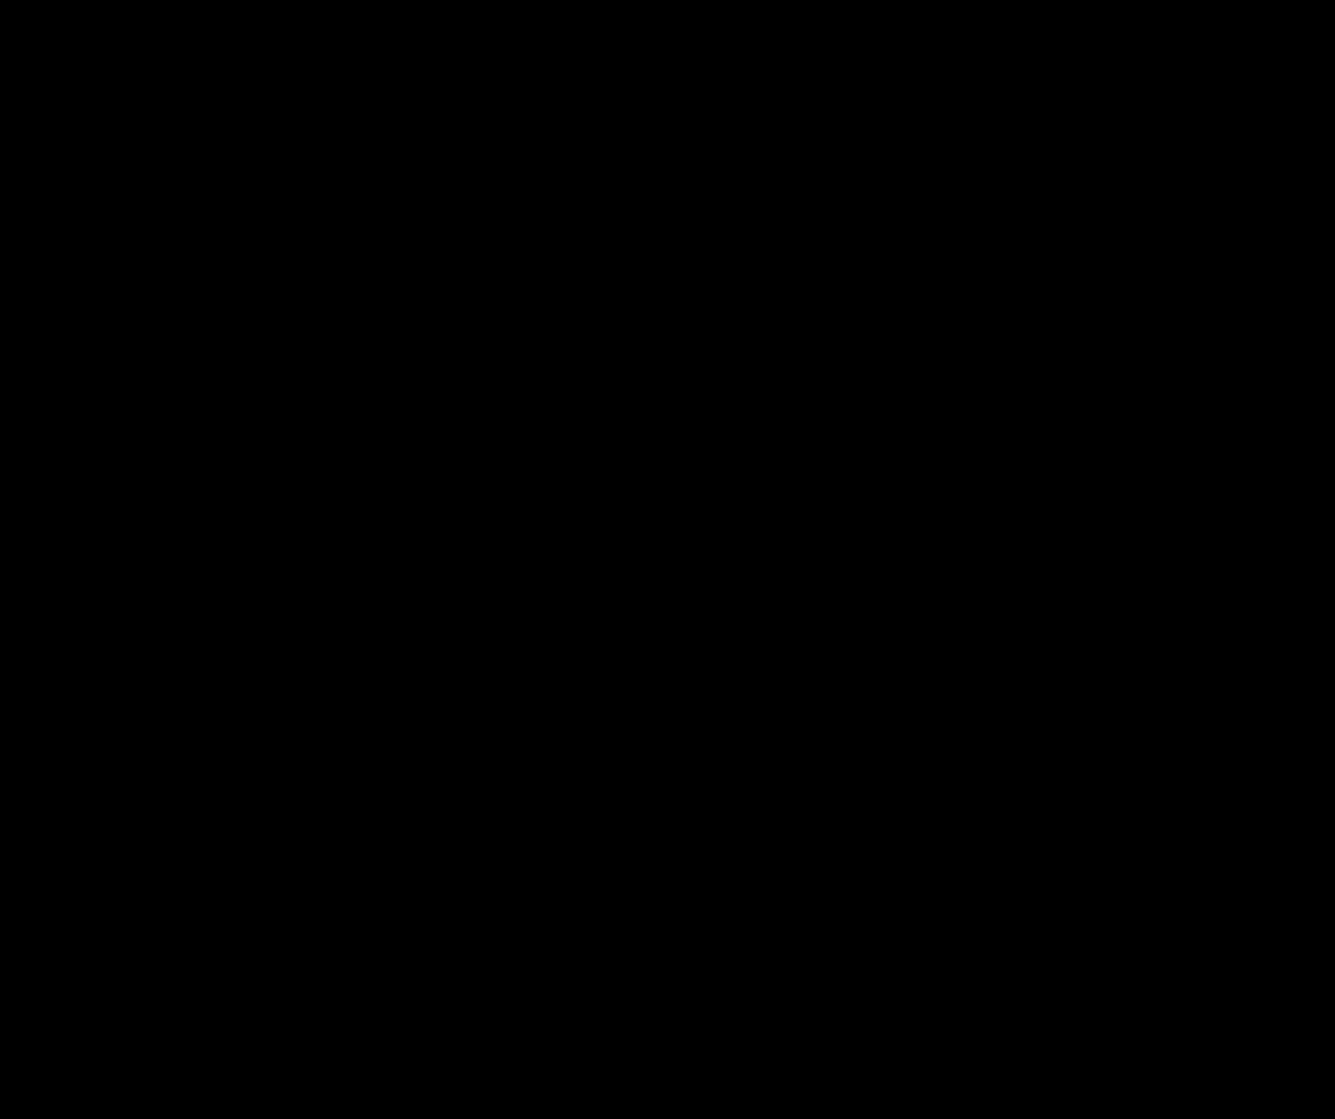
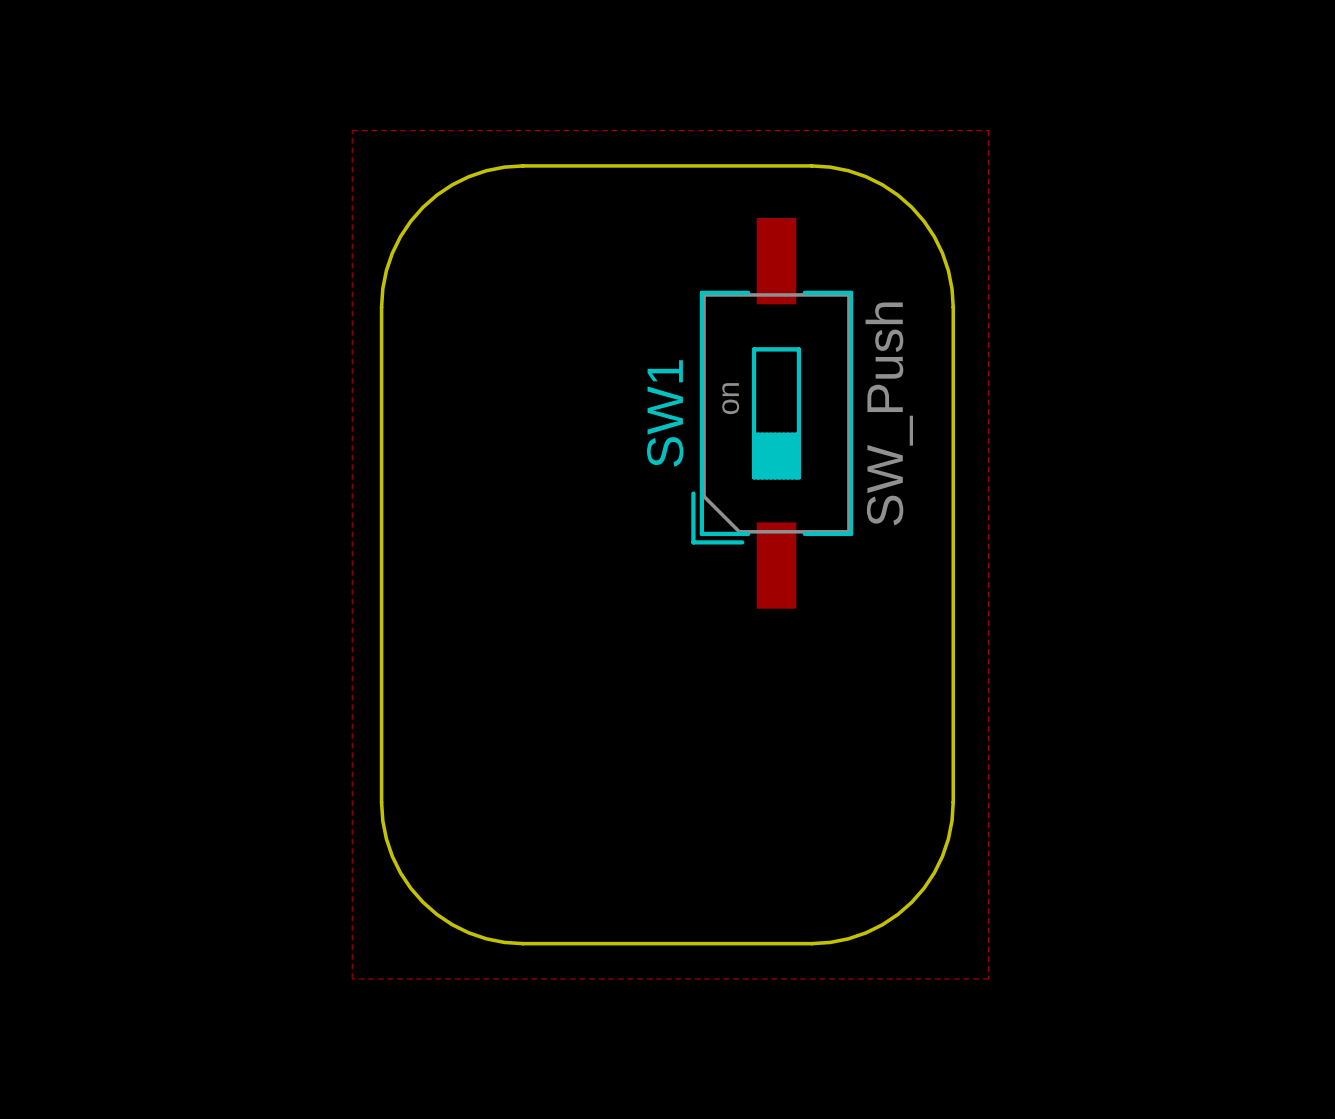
zone outline: none -> (352, 130) (352, 978) (988, 978) (988, 130) (352, 130)
board edge: none -> (522, 165) (811, 165) (848, 170) (865, 176) (897, 195) (924, 221) (942, 253) (952, 288) (953, 307) (952, 820) (942, 856) (924, 888) (897, 914) (865, 932) (848, 938) (811, 943) (504, 942) (468, 932) (436, 914) (410, 888) (392, 856) (386, 838) (381, 802) (382, 288) (392, 253) (400, 236) (422, 207) (436, 195) (468, 176) (486, 170) (522, 165)
SW1: none -> SW_Push (772, 413)

